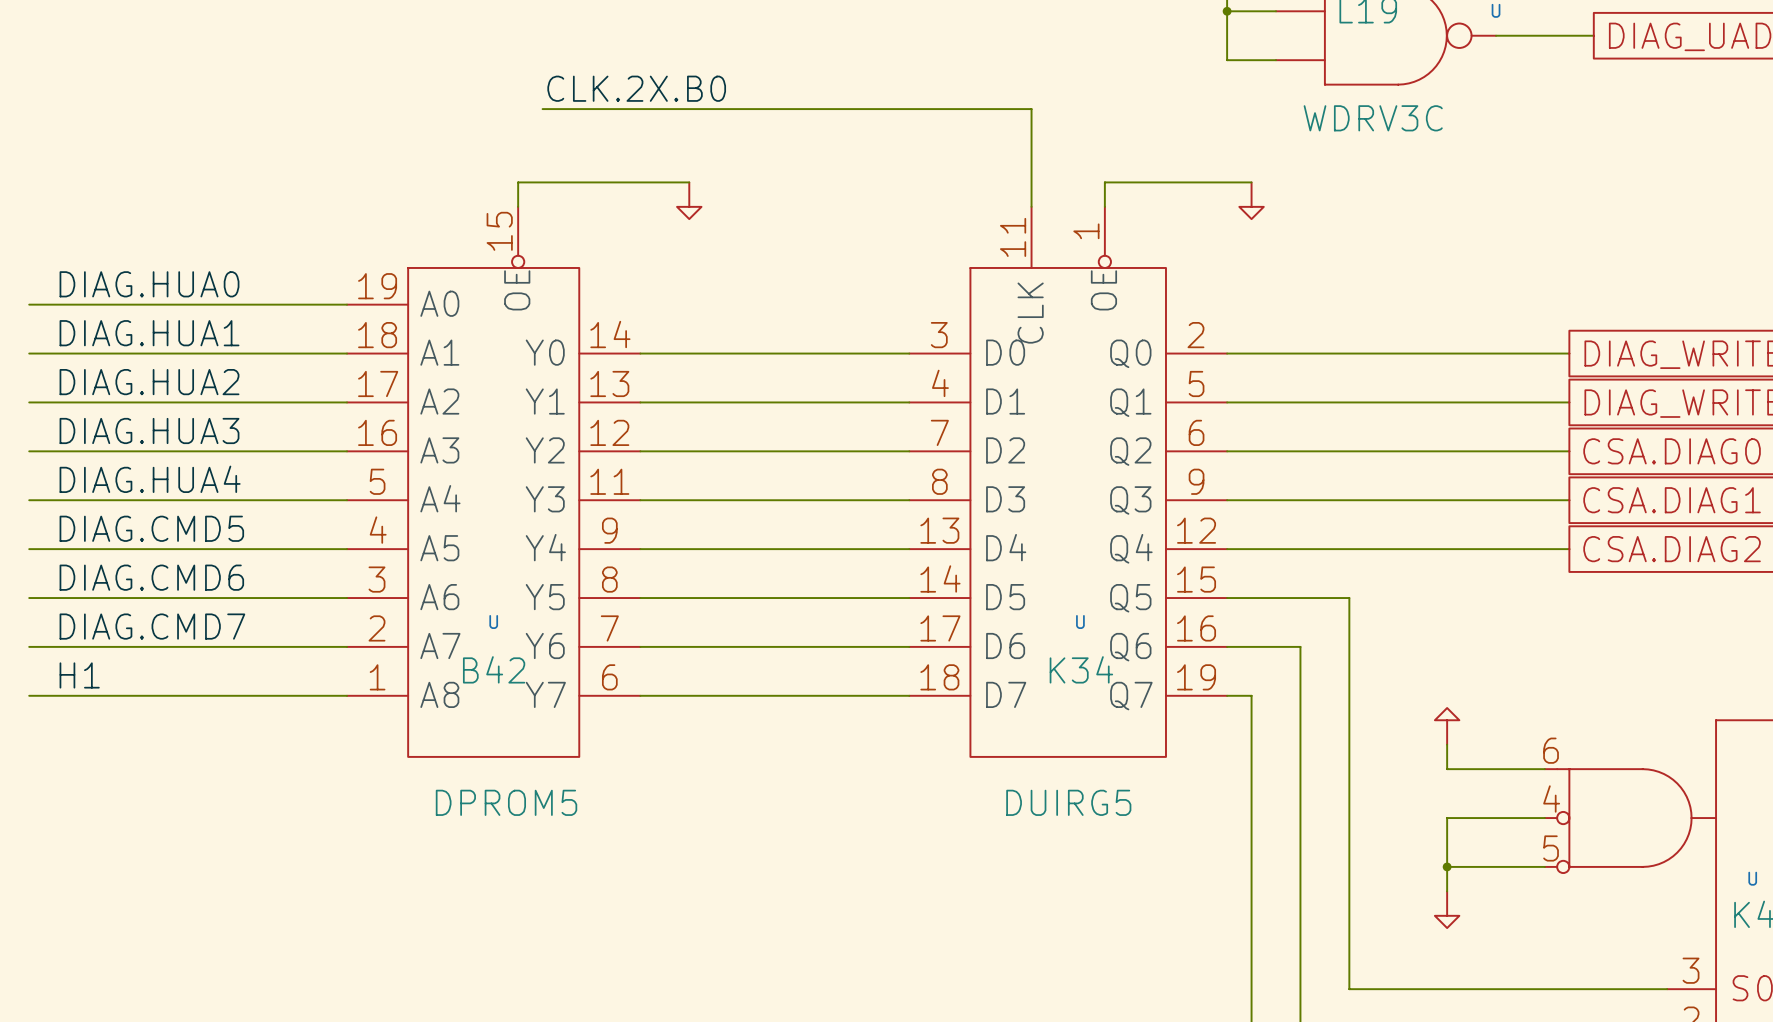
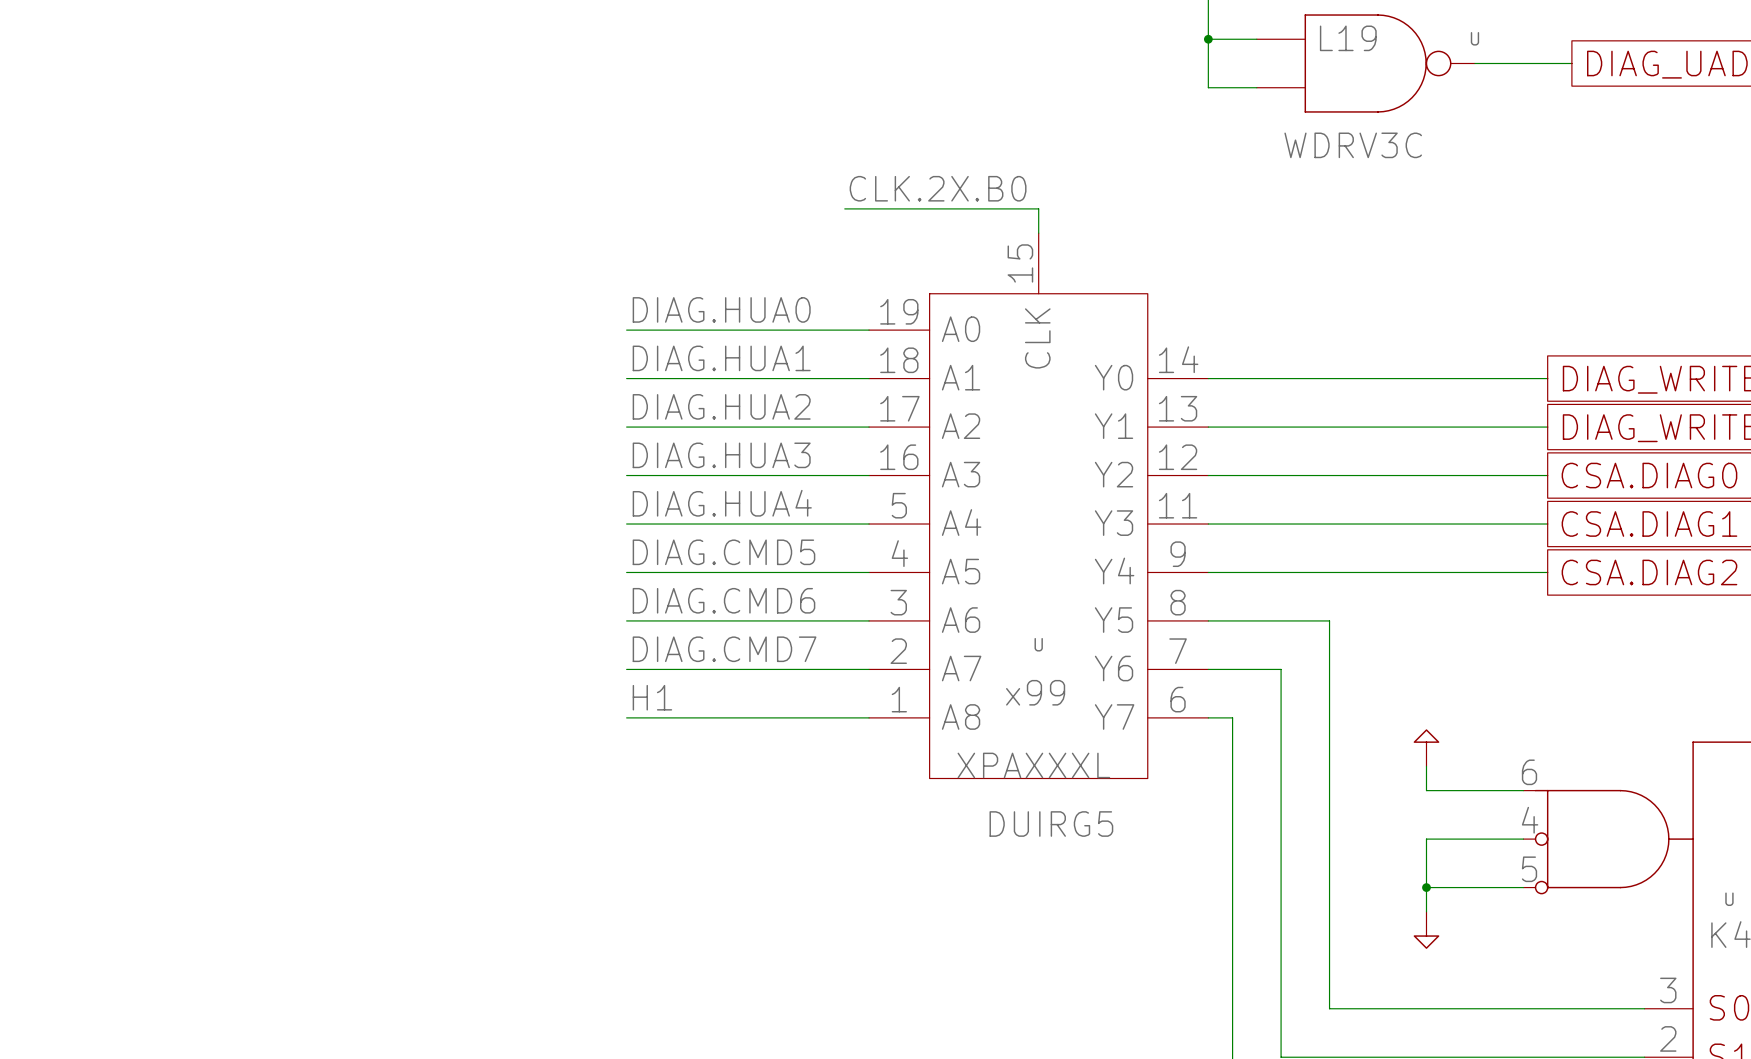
label: CLK.2X.B0 (636, 88) -> none
wire: (542, 109) (1031, 109) (1031, 206) -> none
label: none -> CLK.2X.B0 (938, 188)
wire: (689, 182) (518, 182) (518, 206) -> none
wire: none -> (844, 208) (1038, 208) (1038, 233)
wire: (1251, 182) (1104, 182) (1104, 206) -> none
power symbol: (689, 201) -> none
power symbol: (1251, 201) -> none
label: DIAG.HUA0 (149, 284) -> none
label: none -> DIAG.HUA0 (721, 309)
wire: (29, 304) (347, 304) -> none
wire: none -> (626, 330) (869, 330)
label: DIAG.HUA1 (149, 333) -> none
label: none -> DIAG.HUA1 (721, 358)
wire: (29, 353) (347, 353) -> none
label: DIAG.HUA2 (149, 382) -> none
label: none -> DIAG.HUA2 (721, 406)
wire: (29, 402) (347, 402) -> none
label: DIAG.HUA3 (149, 430) -> none
label: none -> DIAG.HUA3 (721, 455)
wire: (29, 451) (347, 451) -> none
label: DIAG.HUA4 (150, 479) -> none
label: none -> DIAG.HUA4 (722, 503)
U: (493, 481) -> none
U: none -> XPAXXXL (1038, 505)
U: (1068, 481) -> none
wire: (29, 500) (347, 500) -> none
label: DIAG.CMD5 (151, 528) -> none
label: none -> DIAG.CMD5 (723, 552)
wire: (29, 549) (347, 549) -> none
label: DIAG.CMD6 (151, 577) -> none
label: none -> DIAG.CMD6 (723, 600)
wire: (29, 598) (347, 598) -> none
label: DIAG.CMD7 (152, 626) -> none
label: none -> DIAG.CMD7 (724, 649)
wire: (29, 646) (347, 646) -> none
label: H1 (79, 675) -> none
label: none -> H1 (652, 697)
wire: (29, 695) (347, 695) -> none

